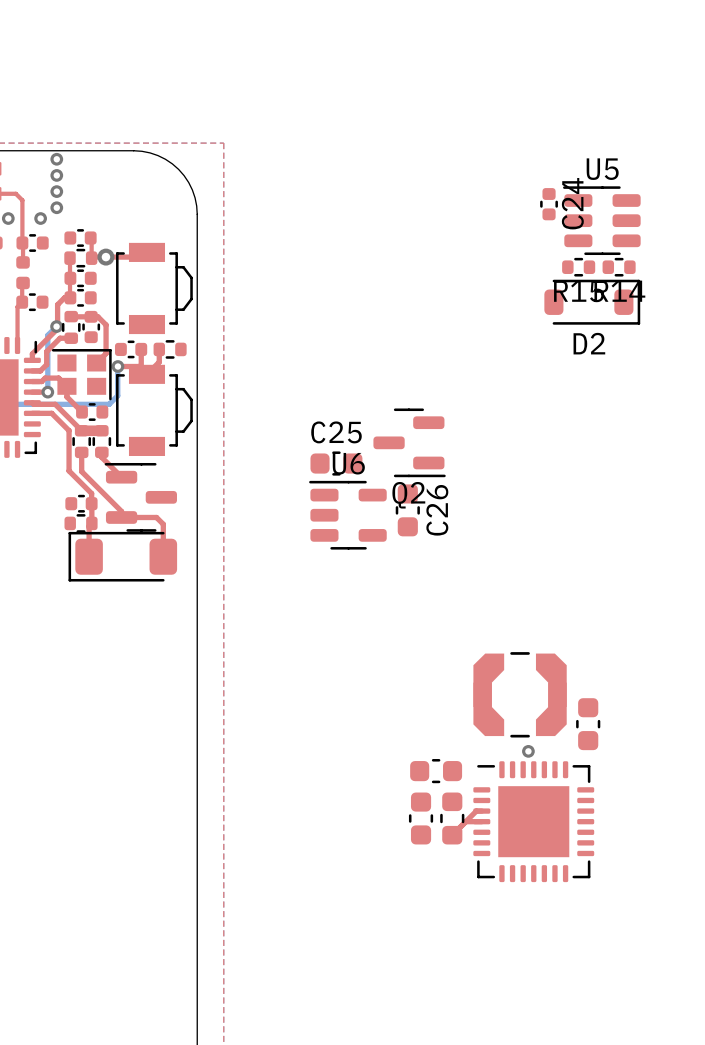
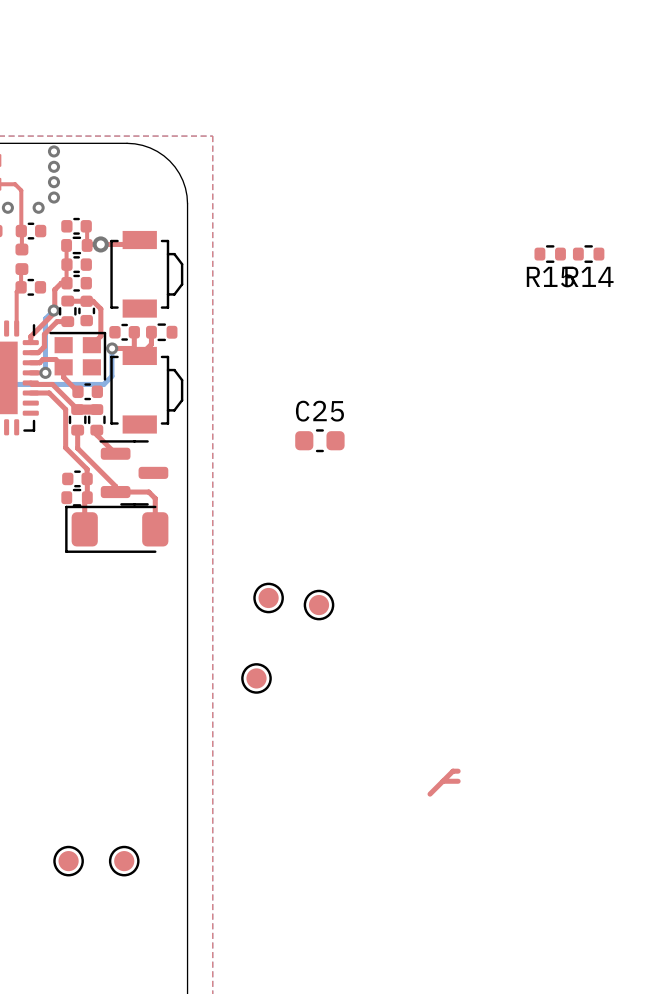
C24: (549, 204) -> none
U5: (601, 220) -> none
D2: (592, 302) -> none
Q2: (409, 442) -> none
C26: (407, 510) -> none
U6: (347, 515) -> none
part: none -> (268, 597)
part: none -> (319, 605)
part: (520, 694) -> none
part: none -> (256, 678)
part: (588, 724) -> none
via: (528, 751) -> none
part: (436, 771) -> none
part: (421, 818) -> none
part: (452, 818) -> none
part: (533, 821) -> none
part: none -> (68, 861)
part: none -> (124, 861)

